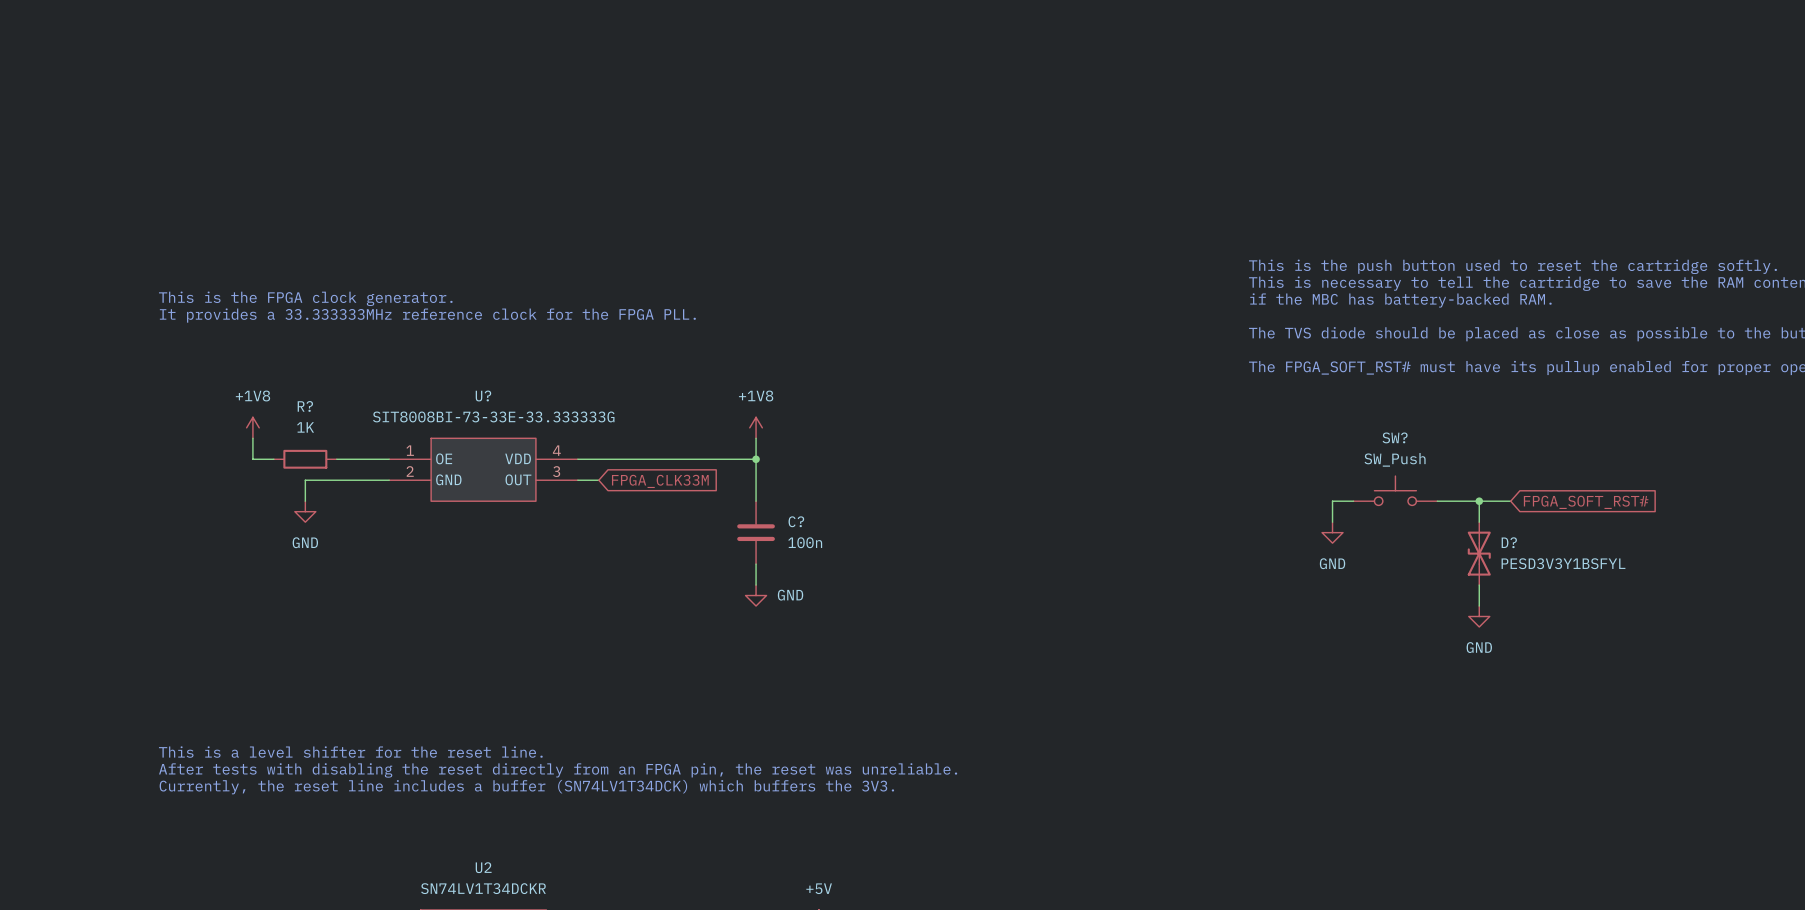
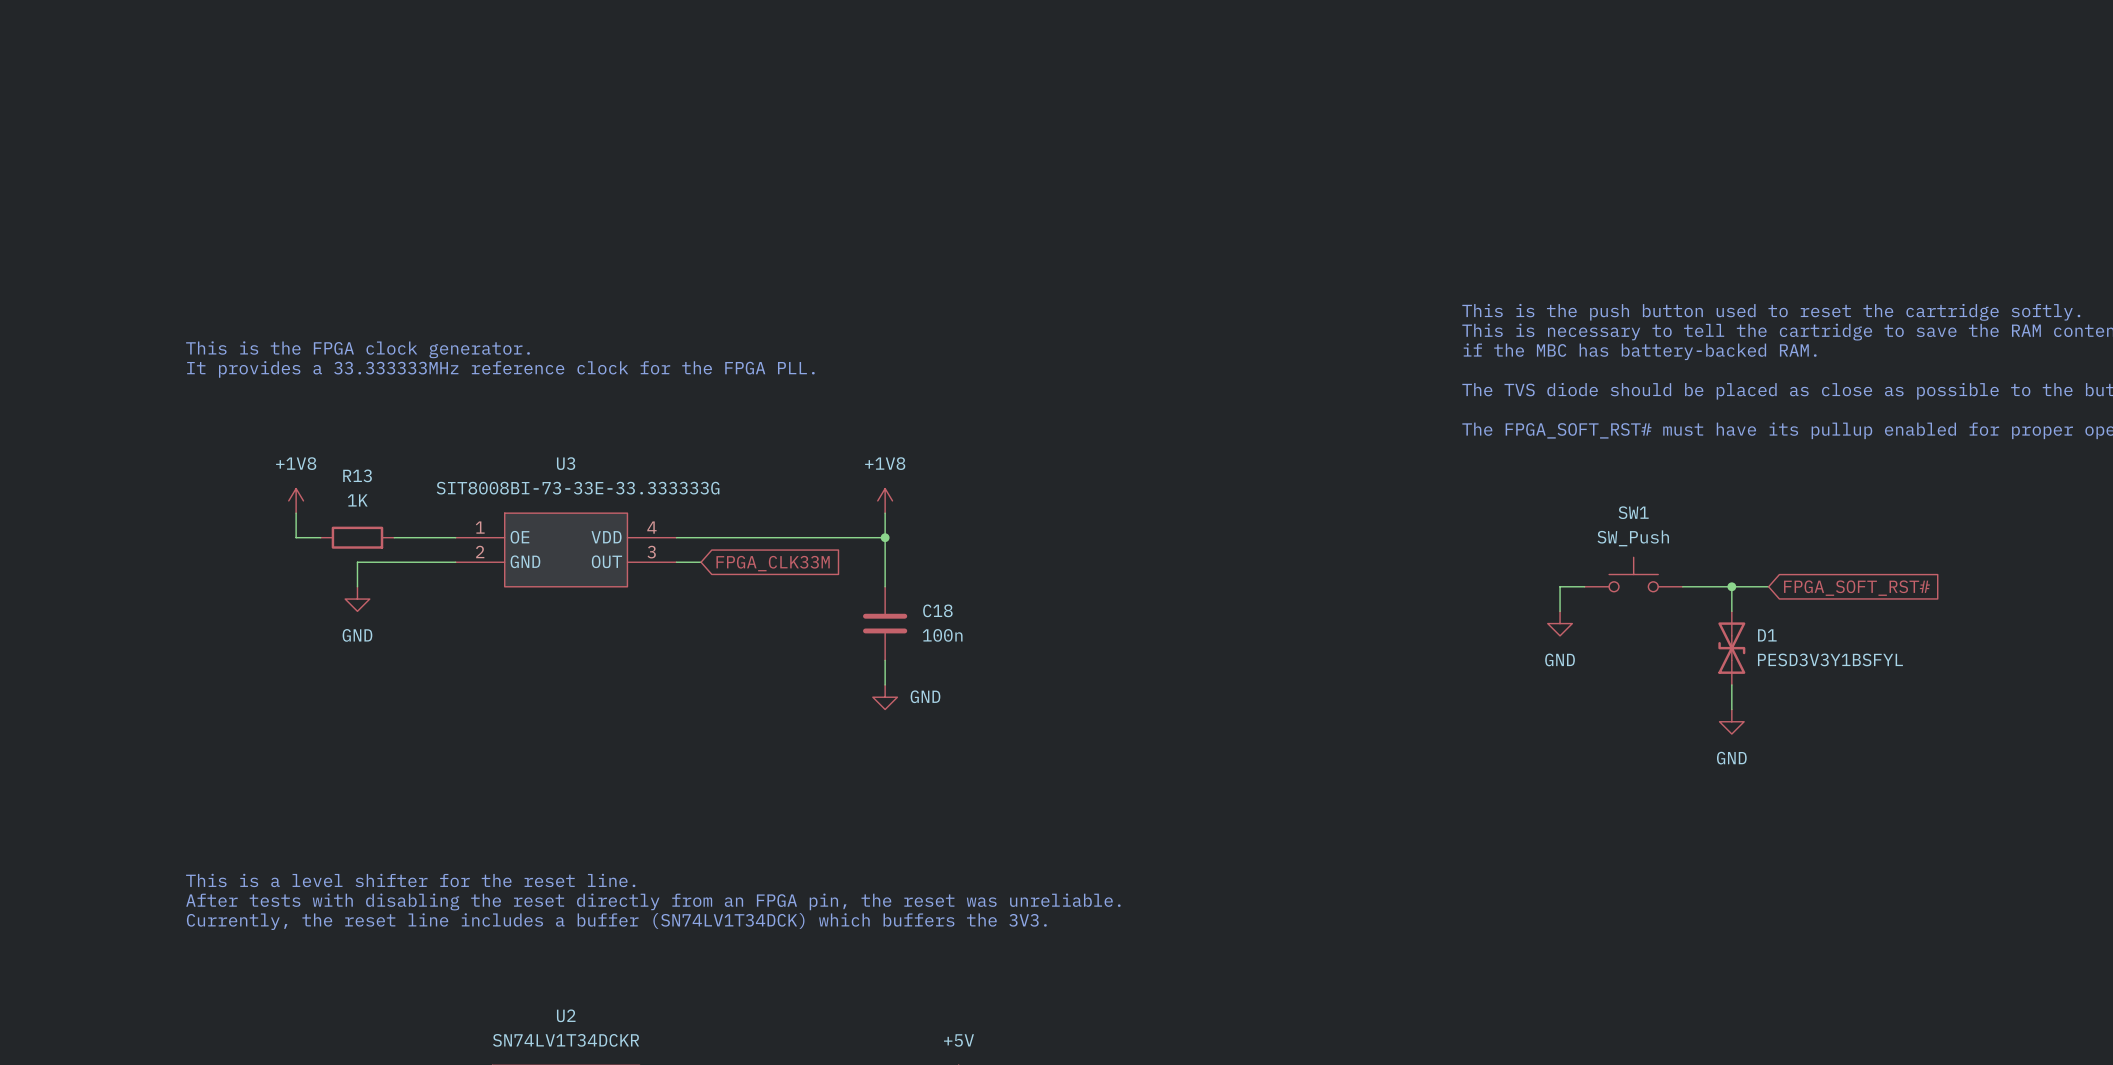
U? name: U? (483, 396) -> U3 (566, 463)
R? name: R? (305, 406) -> R13 (357, 475)
SW? name: SW? (1395, 437) -> SW1 (1633, 512)
C? name: C? (796, 521) -> C18 (937, 610)
D? name: D? (1509, 542) -> D1 (1767, 635)

